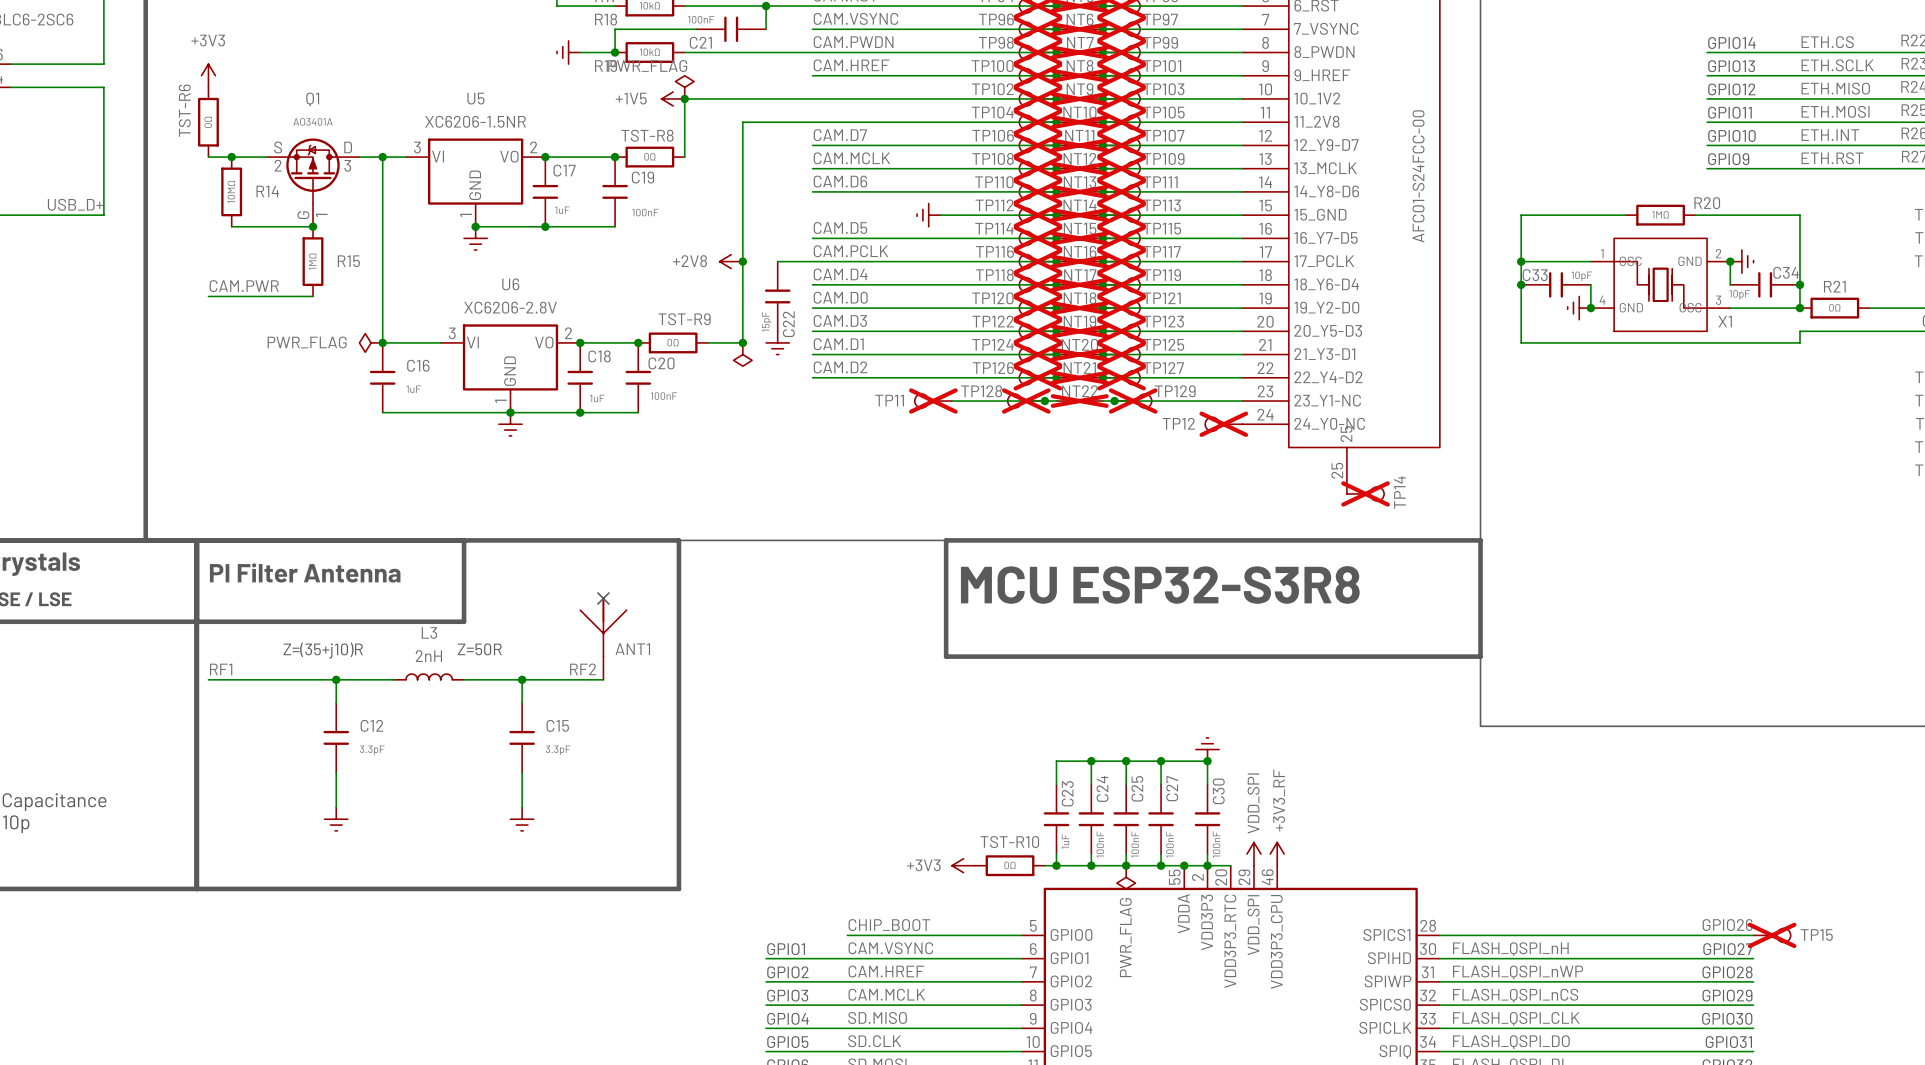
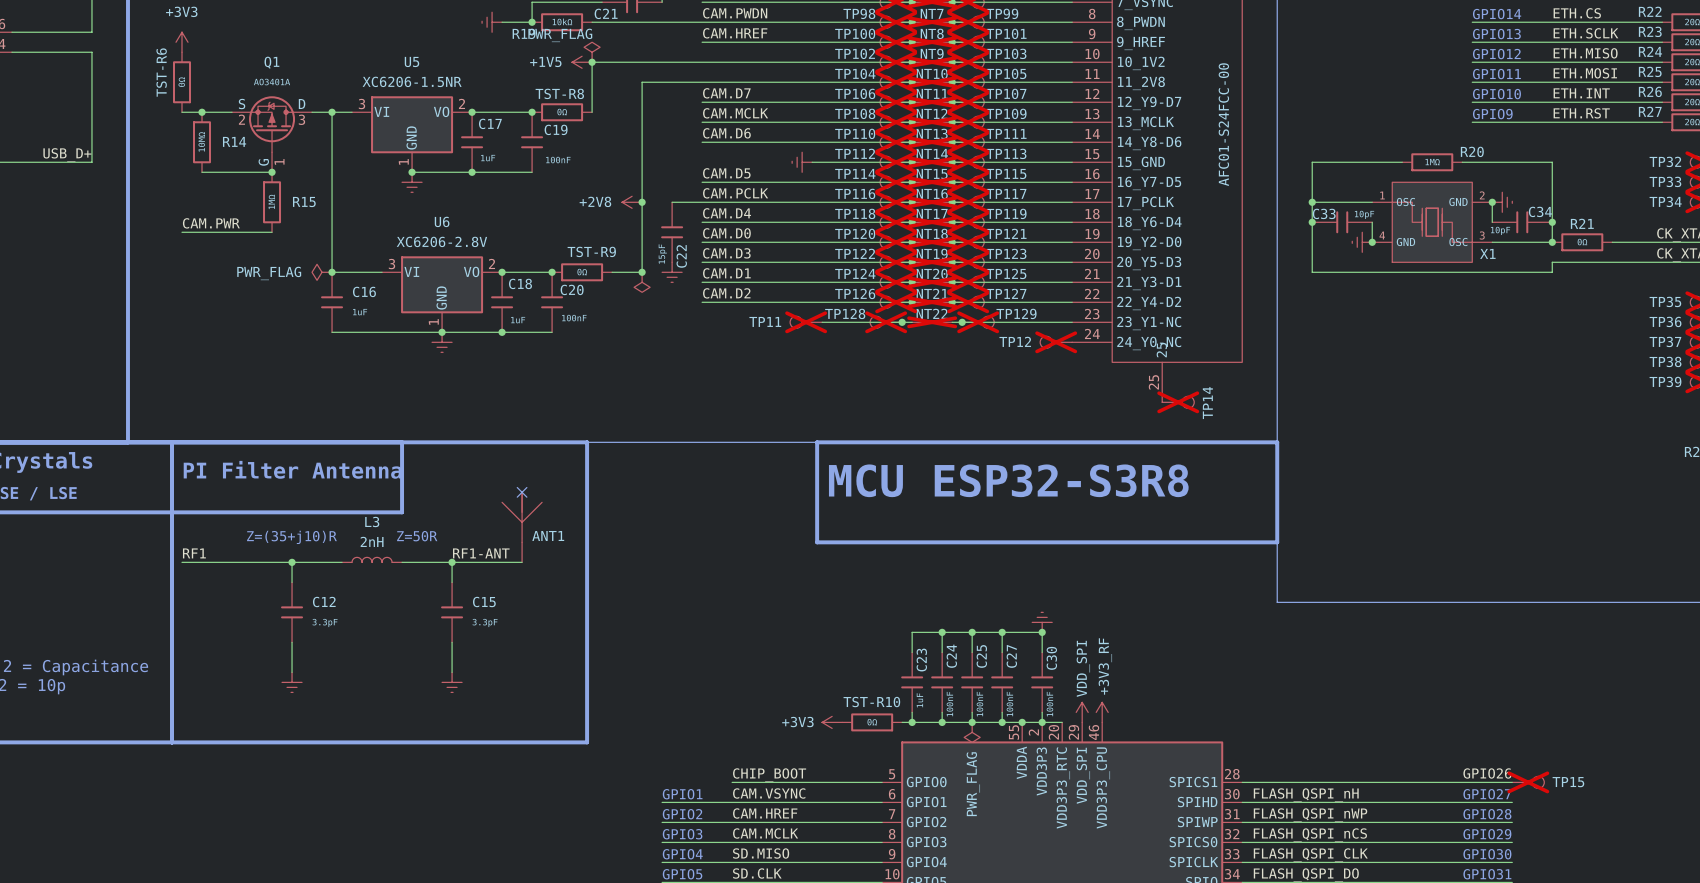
label: none -> RF1-ANT (481, 553)
label: RF2 (583, 669) -> none

